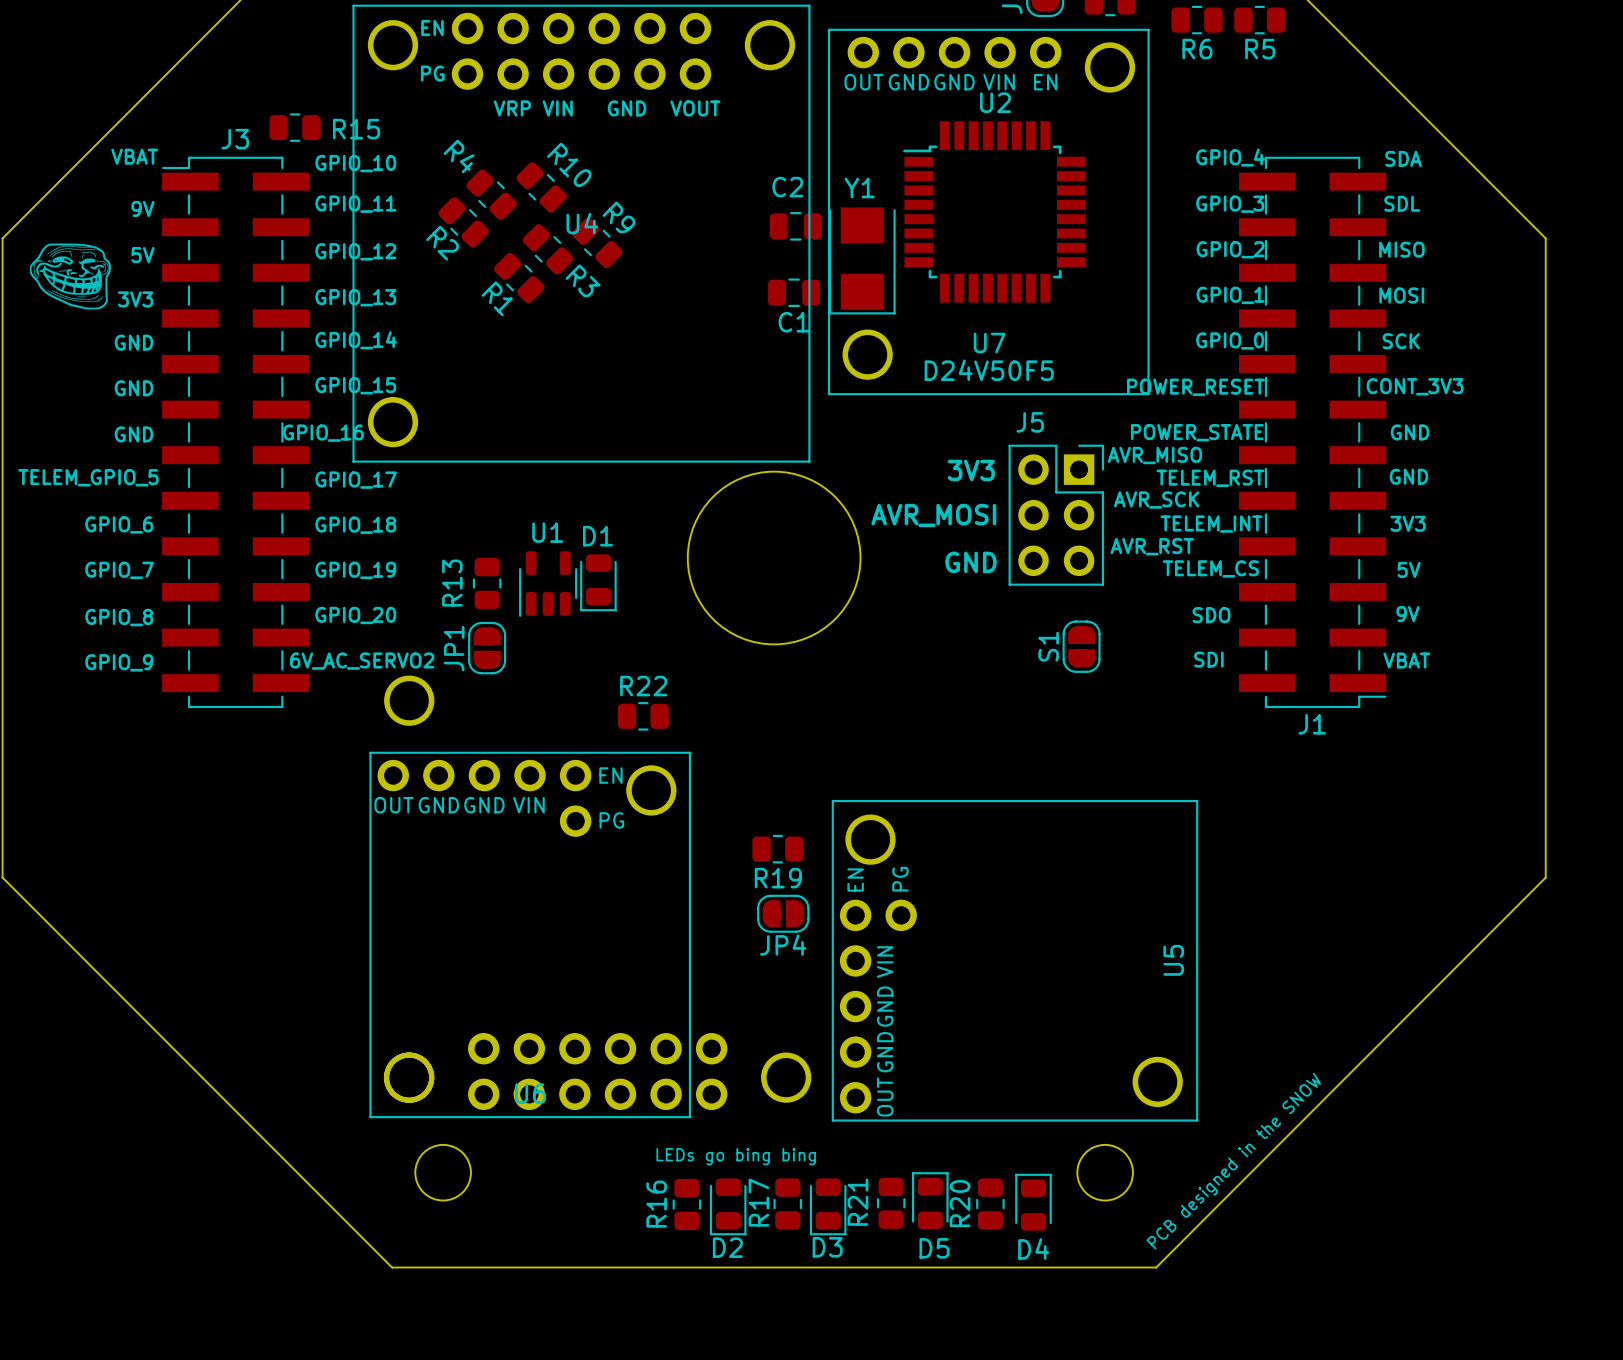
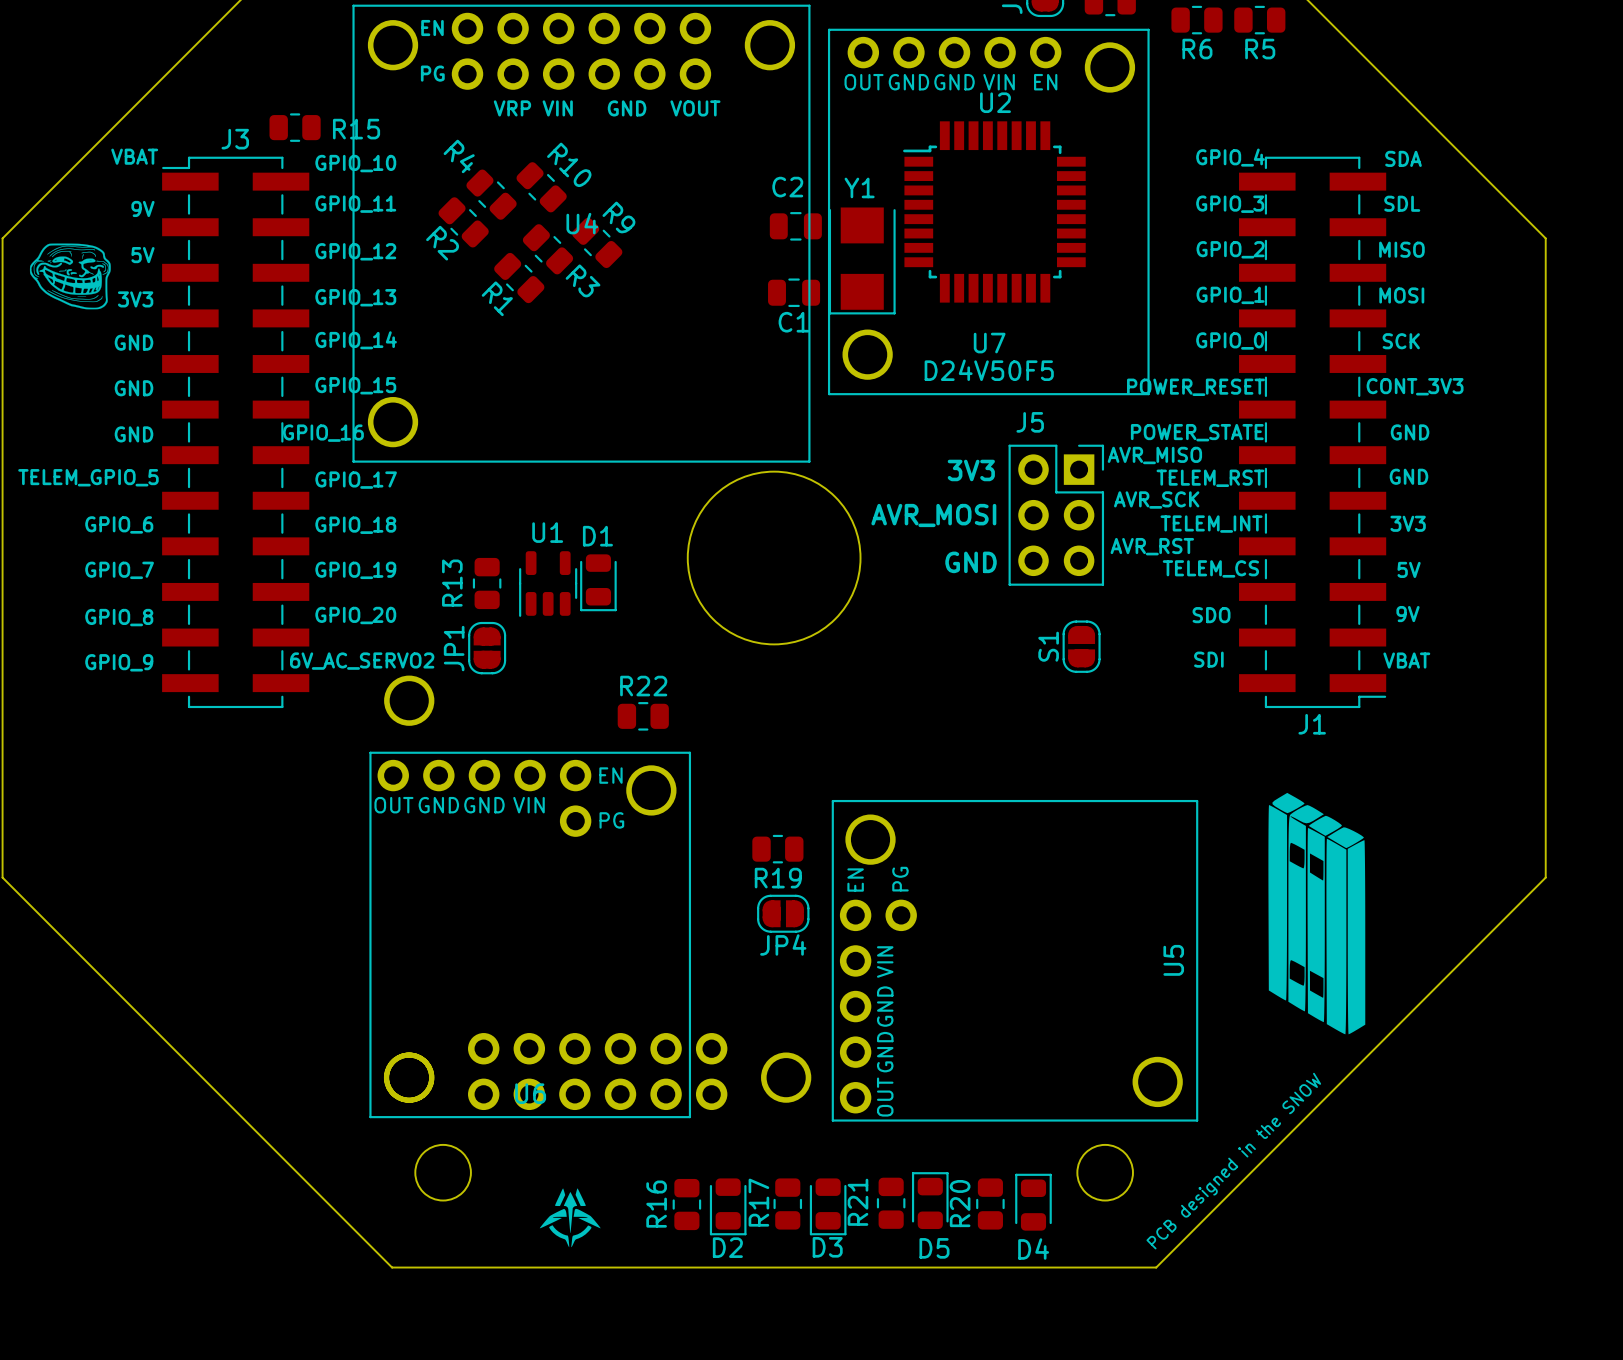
drawing: none -> [1268, 792, 1366, 1035]
text: LEDs go bing bing (736, 1156) -> none
drawing: none -> [539, 1188, 601, 1248]

